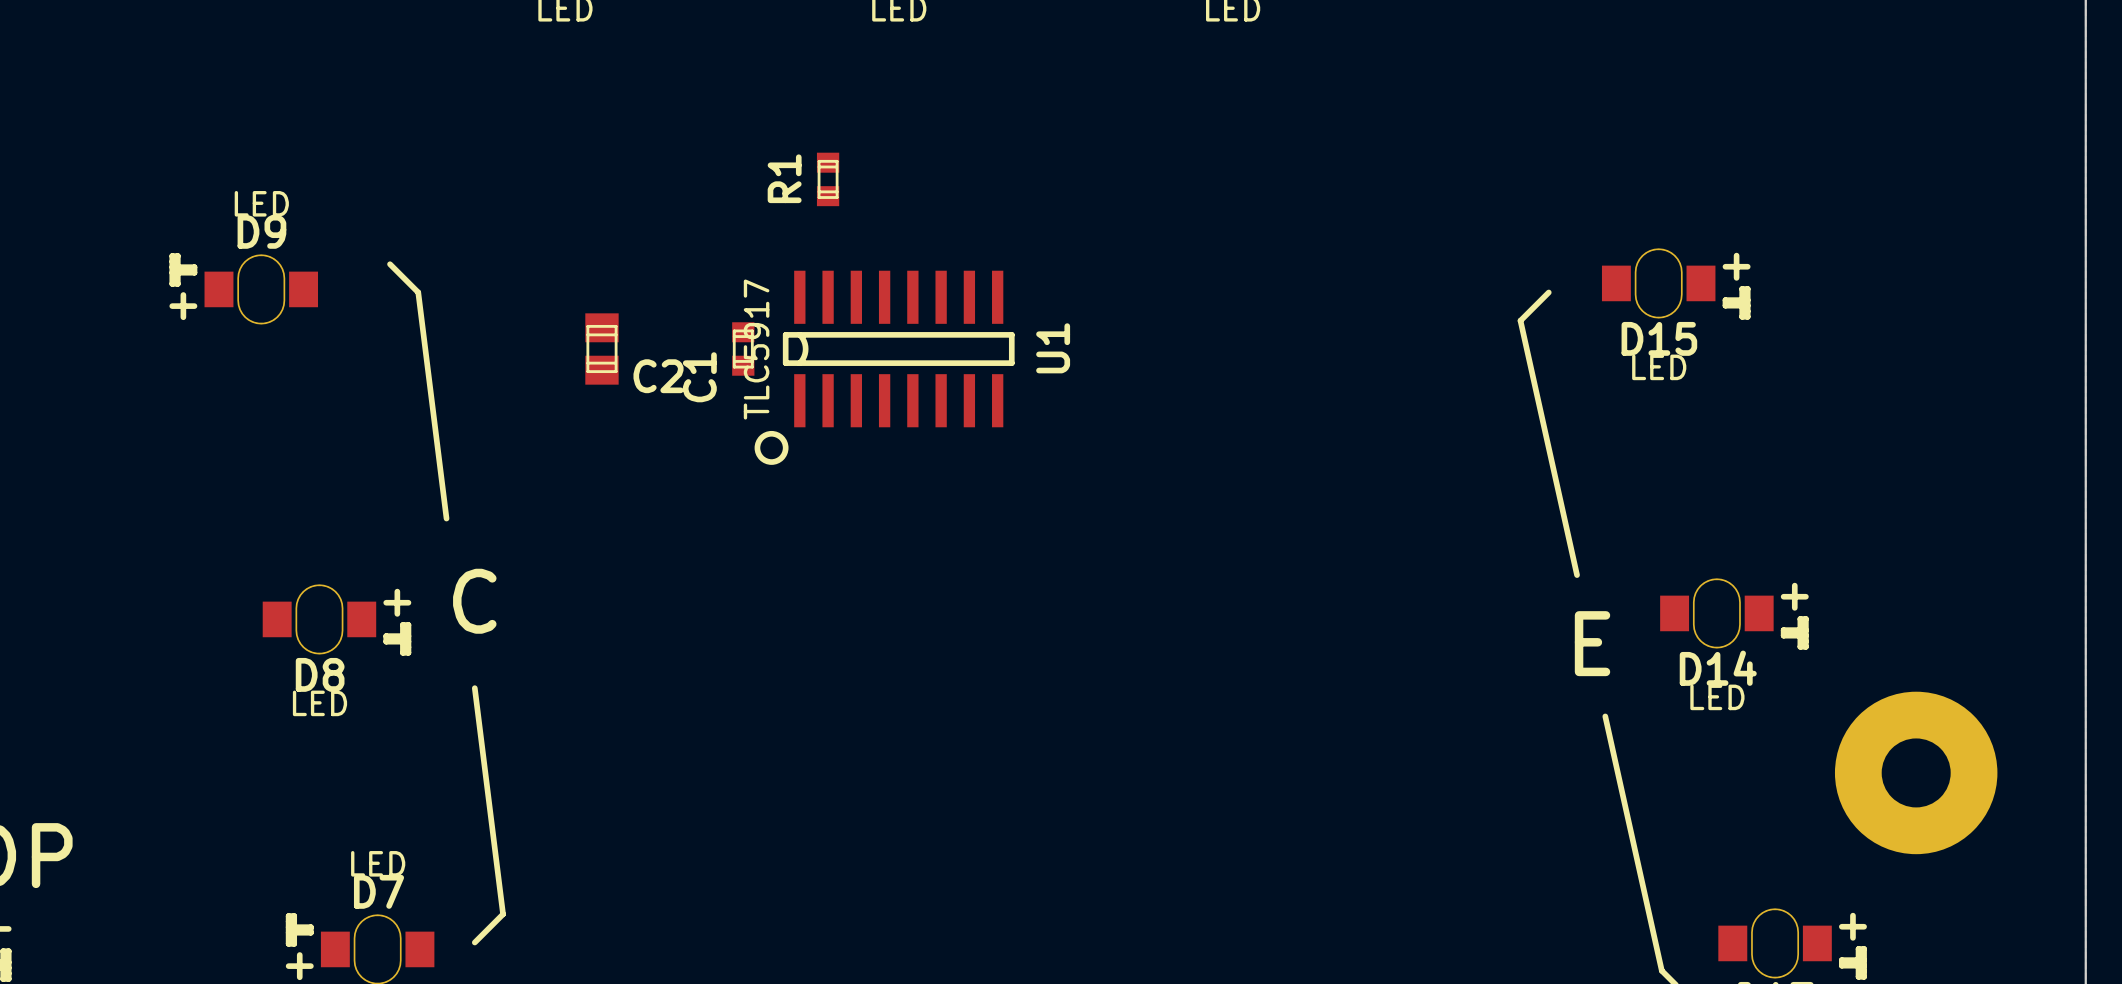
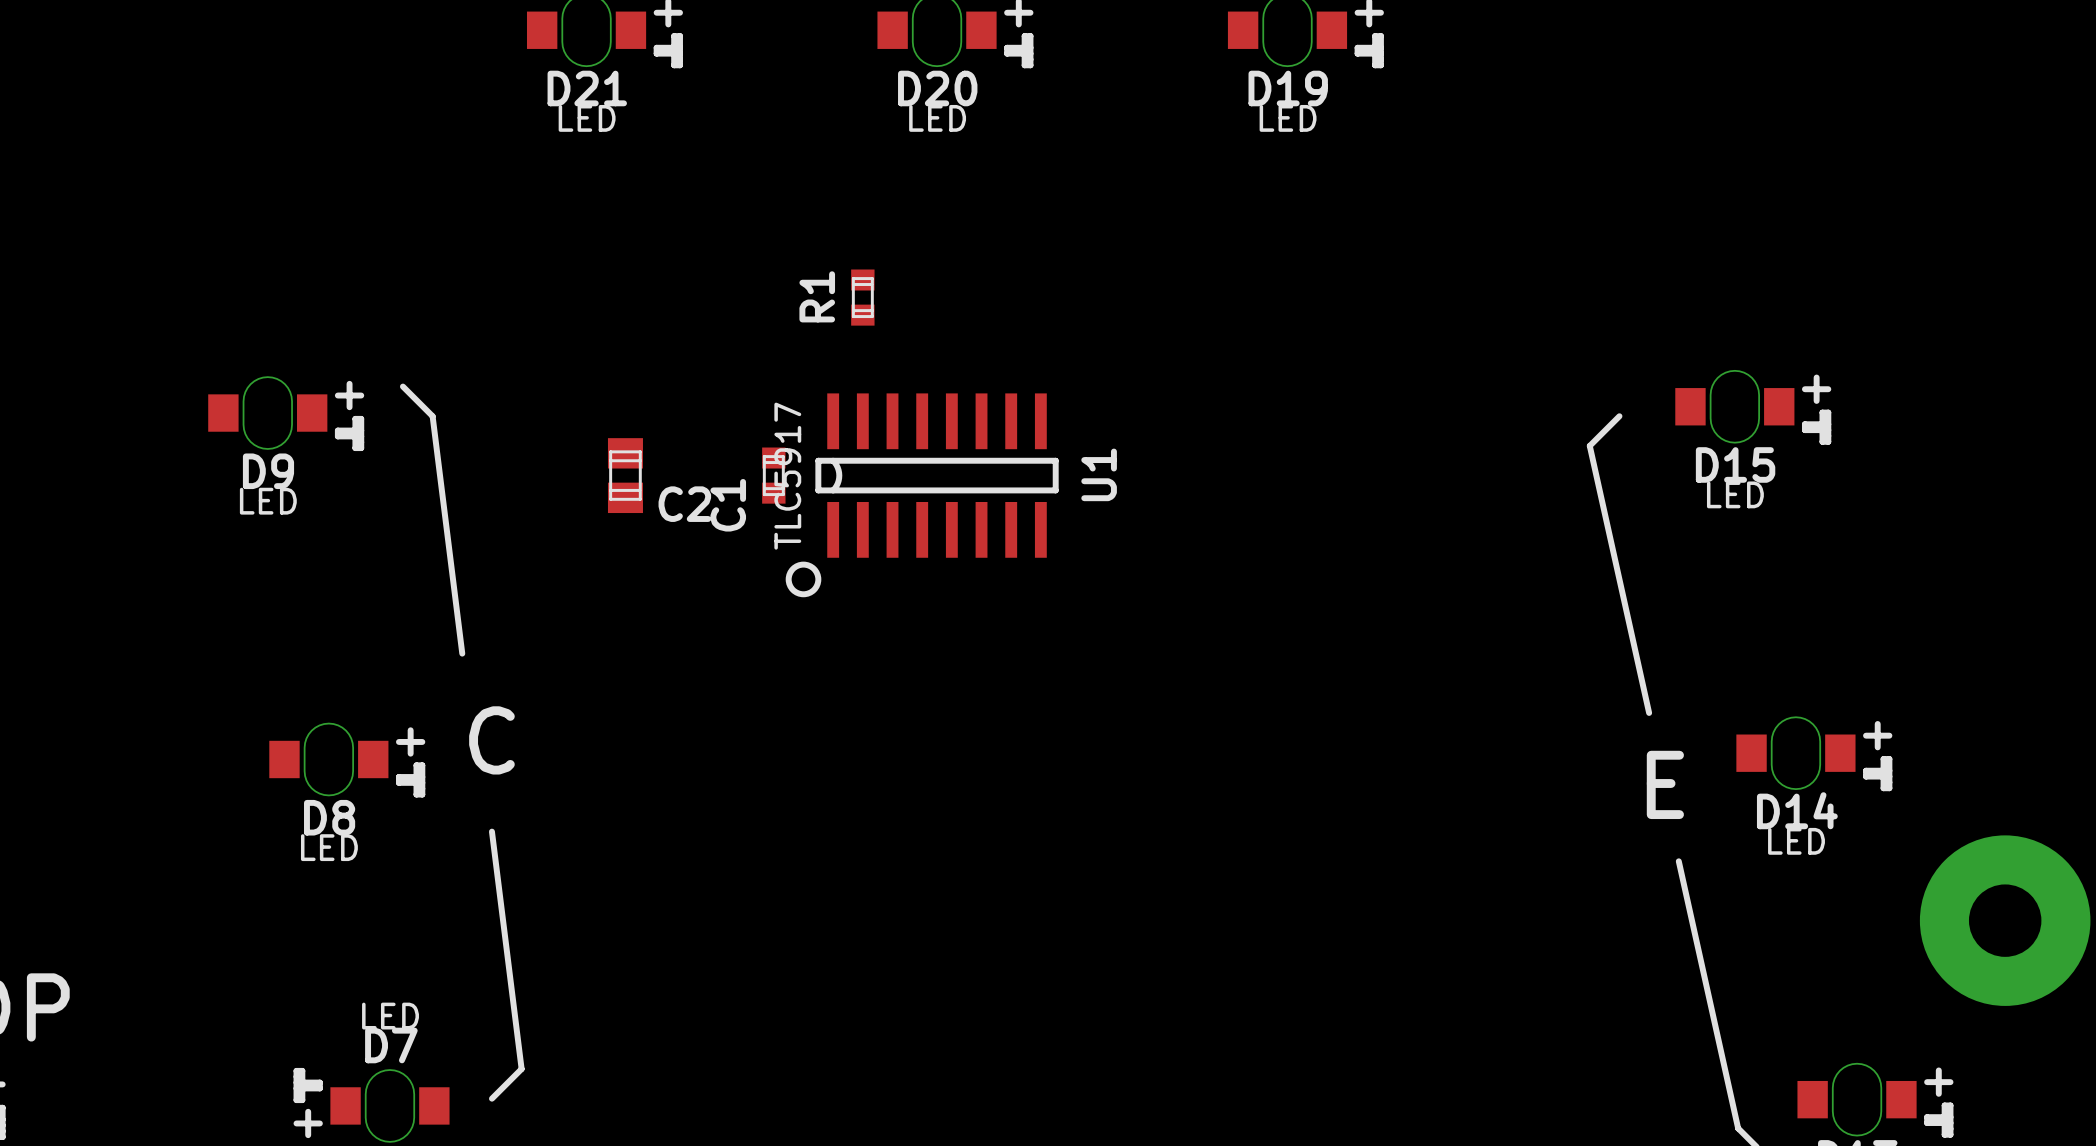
D9 rotation: 0° (243, 288) -> 180° (286, 413)

